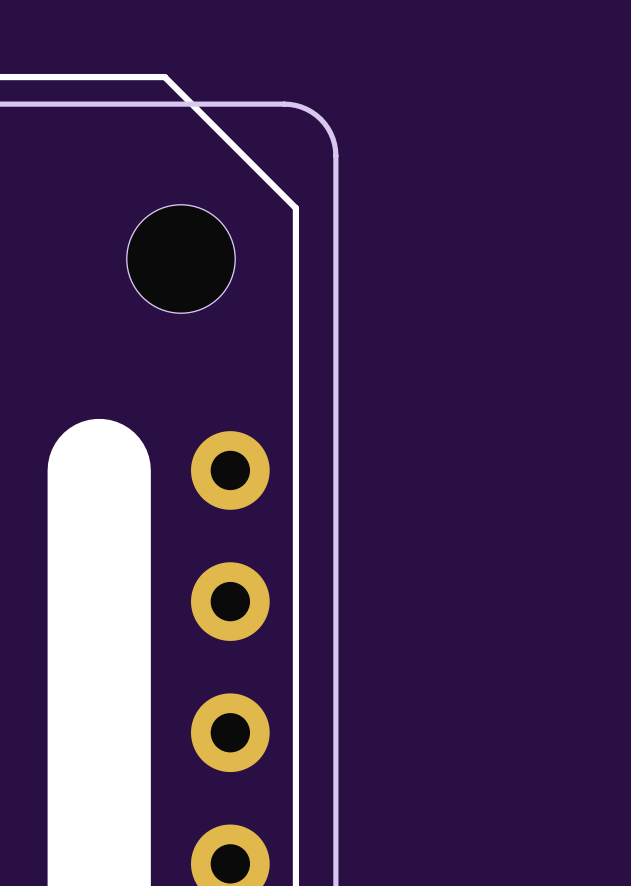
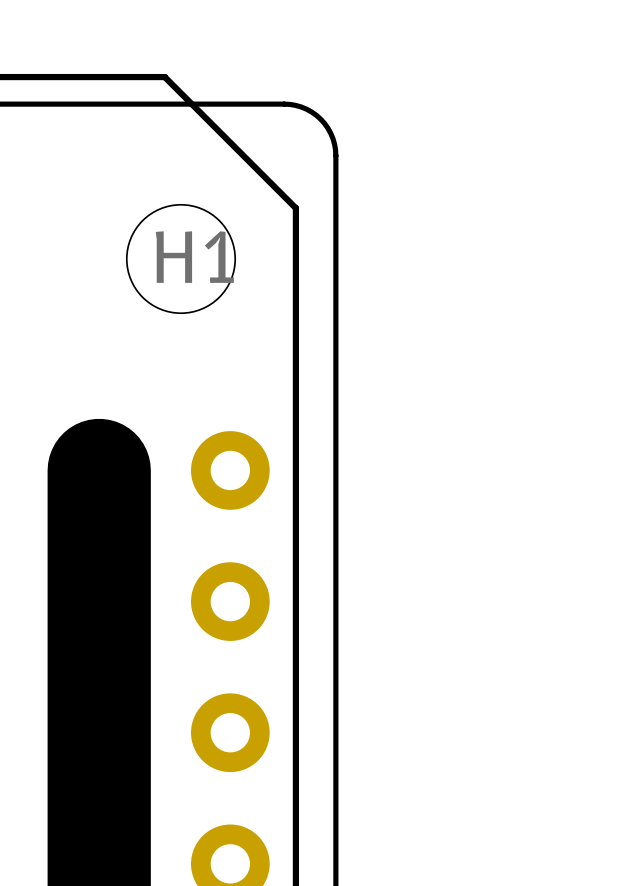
H1 name: none -> H1 (194, 257)

